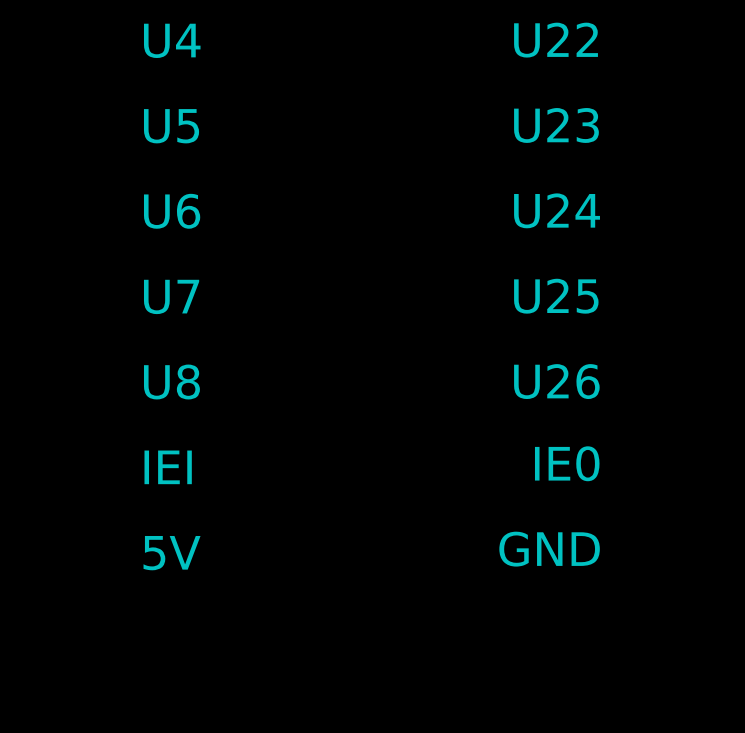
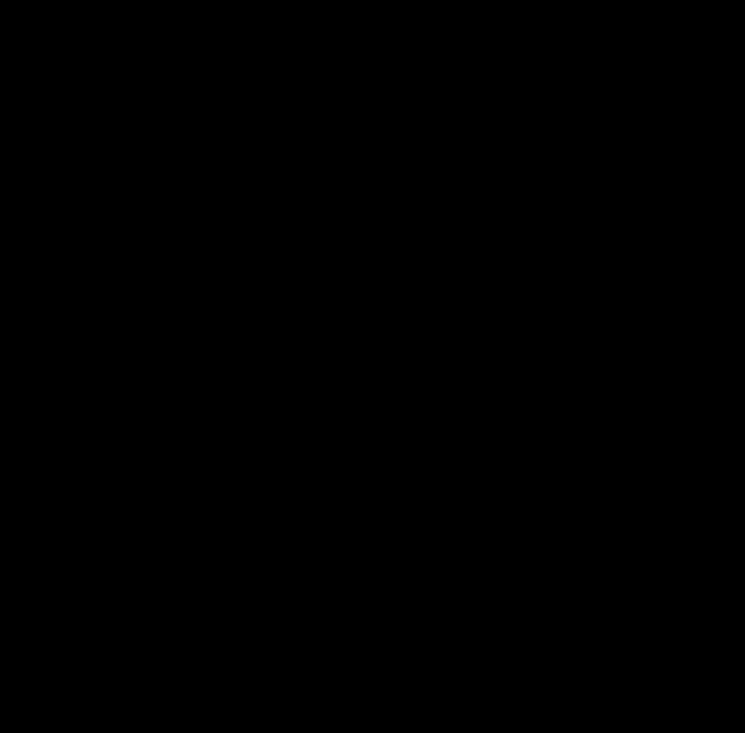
text: U4 (172, 40) -> none
text: U22 (556, 40) -> none
text: U23 (556, 125) -> none
text: U5 (171, 126) -> none
text: U24 (557, 210) -> none
text: U6 (172, 211) -> none
text: U7 (171, 296) -> none
text: U25 (556, 296) -> none
text: U26 (556, 381) -> none
text: U8 (171, 382) -> none
text: IE0 (567, 463) -> none
text: IEI (168, 467) -> none
text: GND (549, 549) -> none
text: 5V (172, 553) -> none

